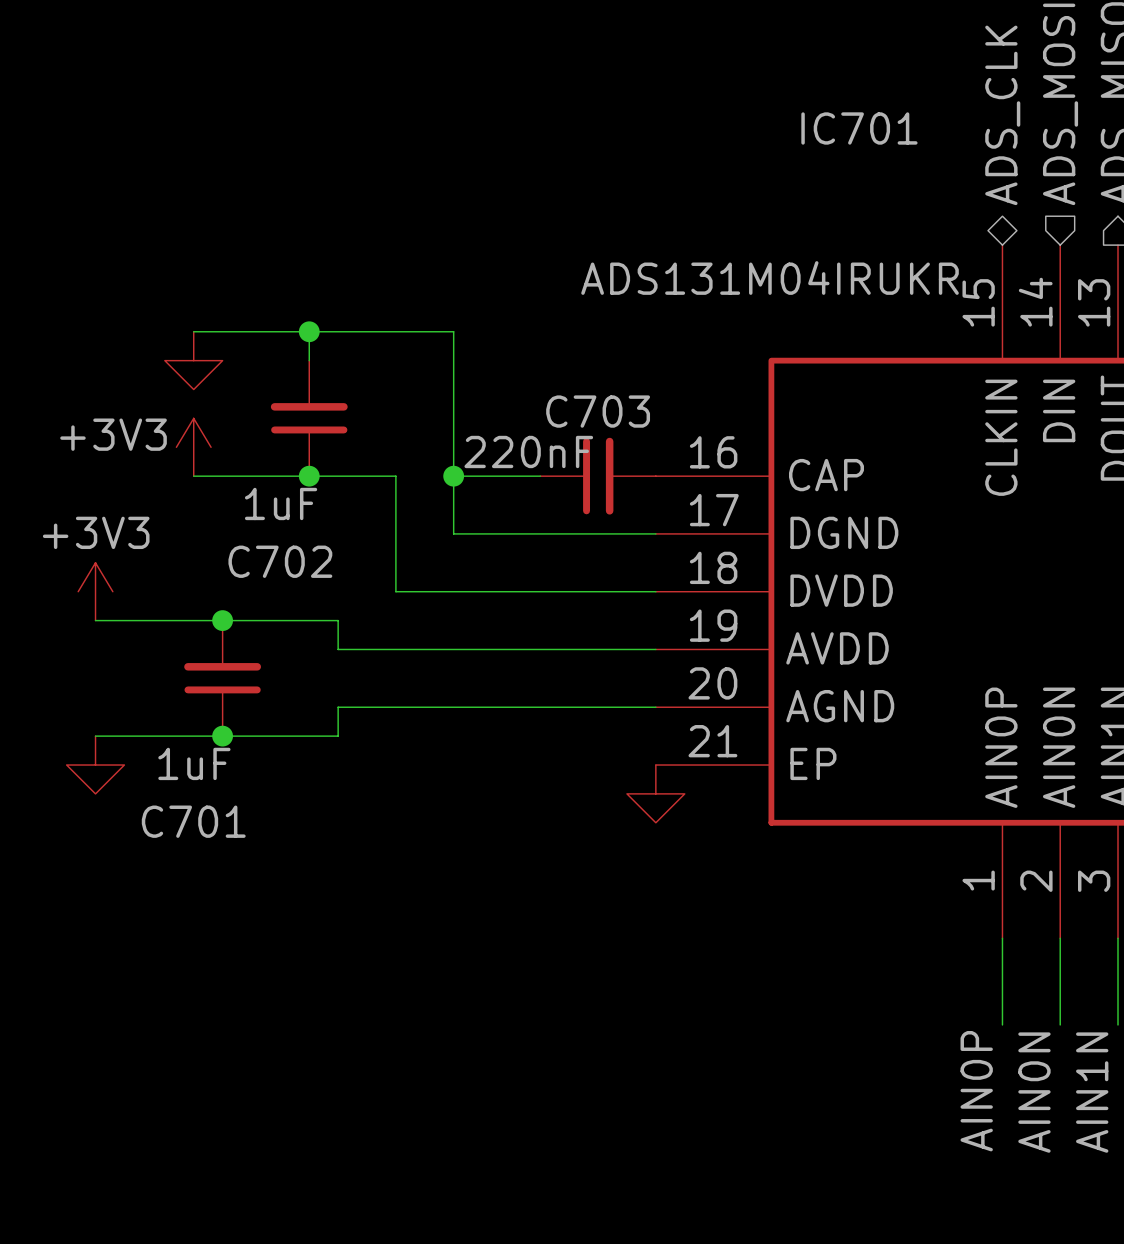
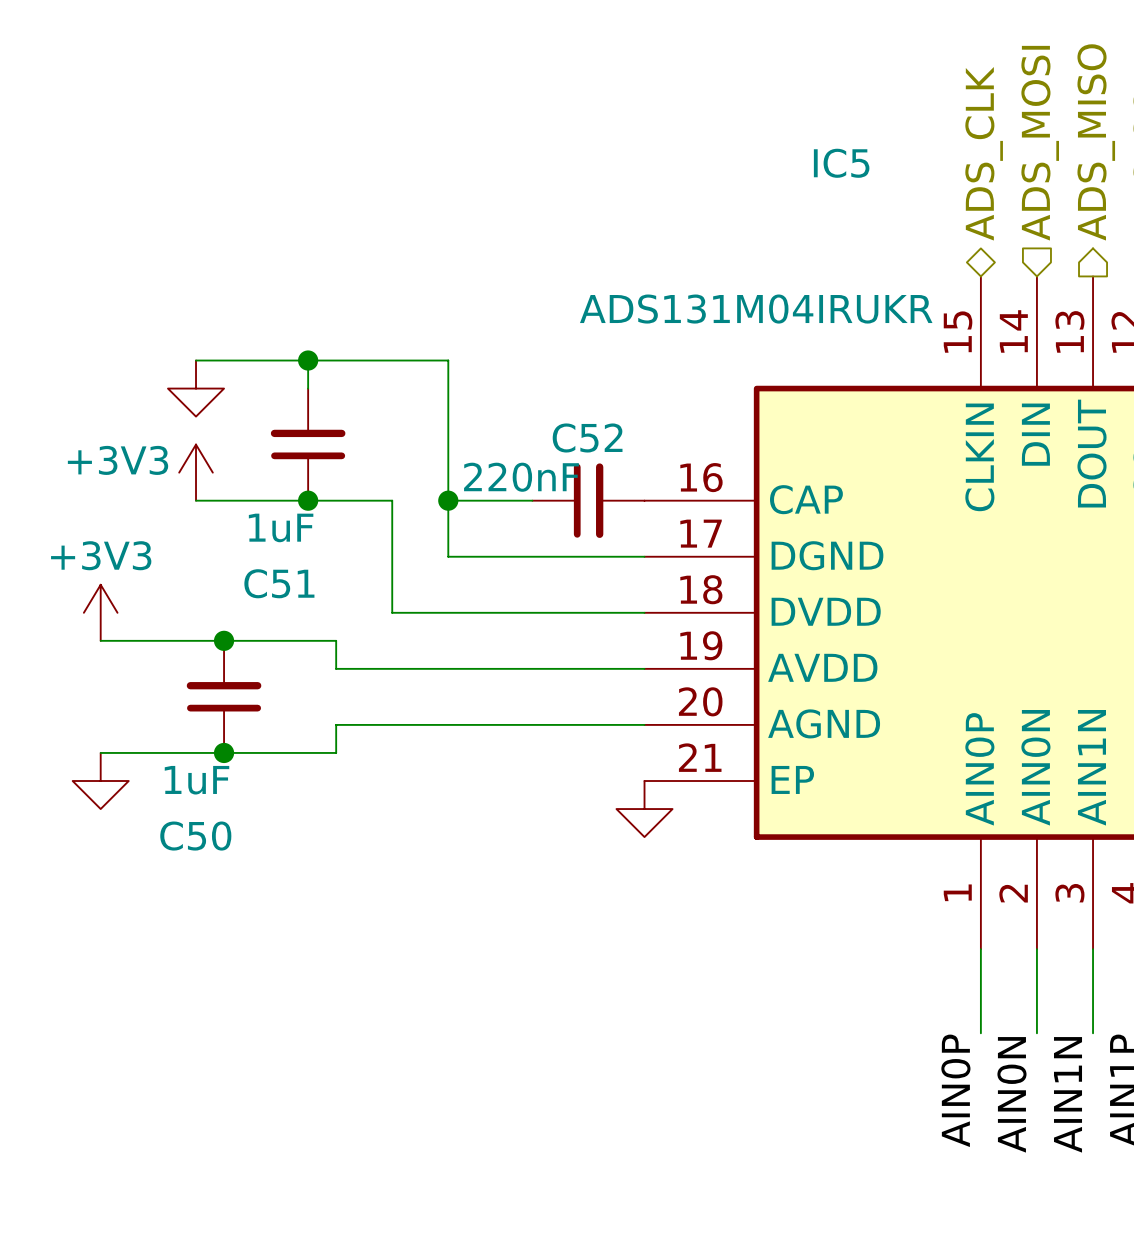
IC701 name: IC701 (859, 128) -> IC5 (841, 163)
C703 name: C703 (598, 411) -> C52 (587, 437)
C702 name: C702 (280, 561) -> C51 (279, 583)
C701 name: C701 (193, 821) -> C50 (195, 836)

